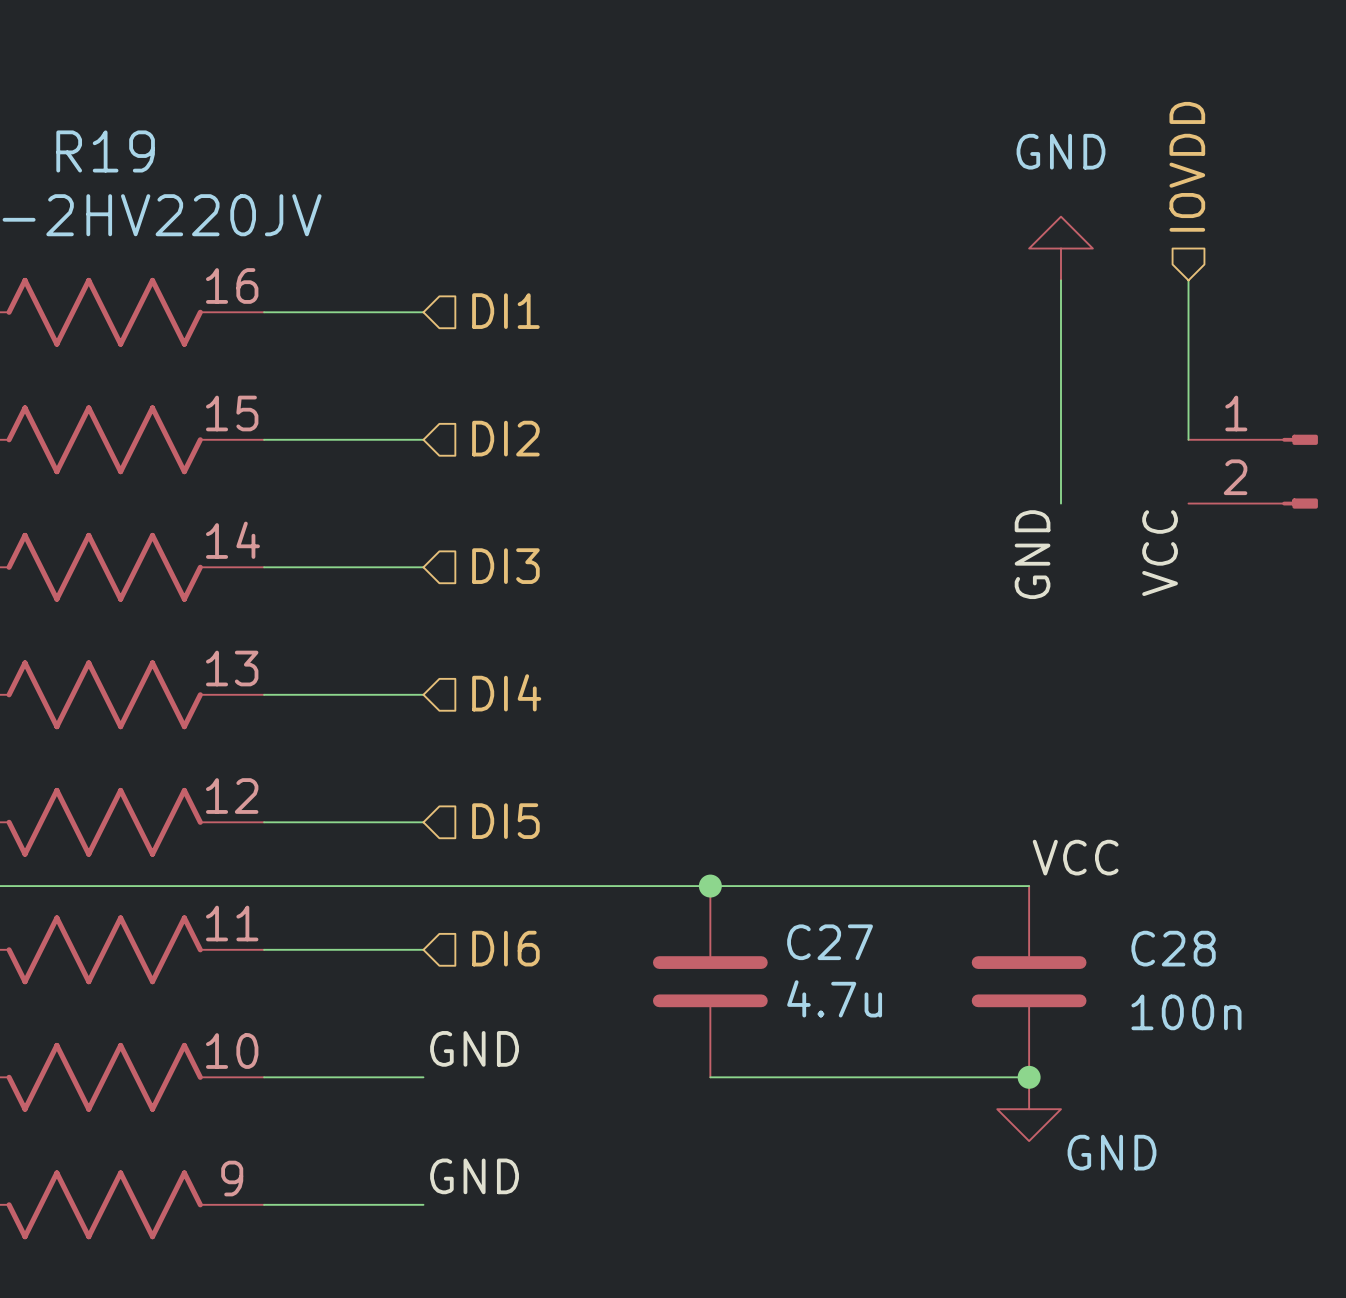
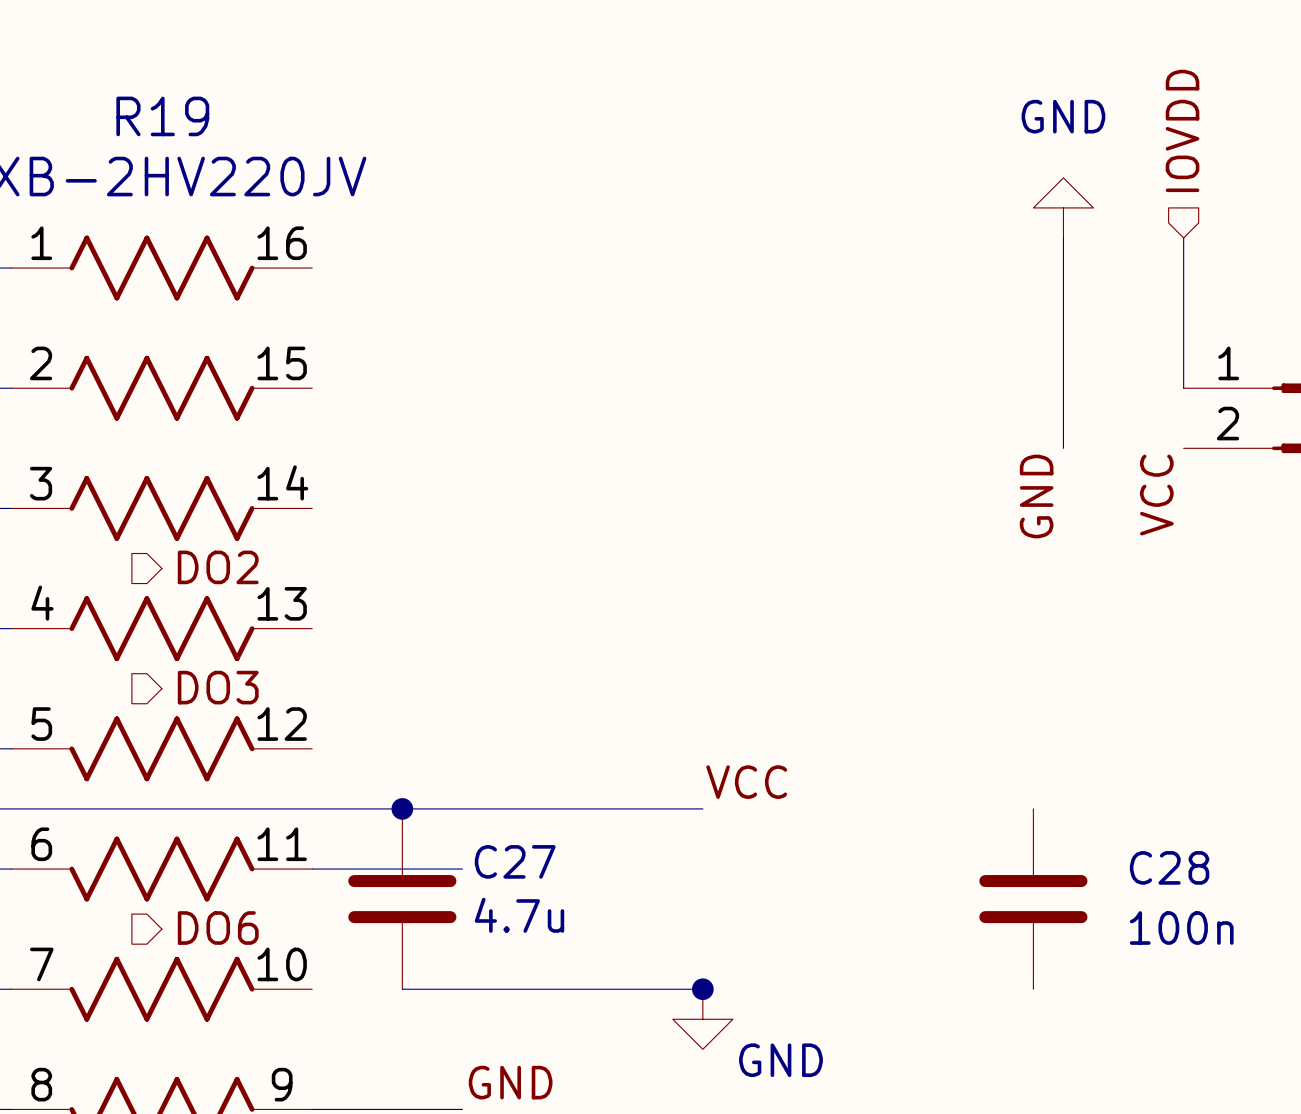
hierarchical label: DI1 (505, 311) -> none
wire: (264, 312) (423, 312) -> none
hierarchical label: DI2 (505, 438) -> none
wire: (264, 439) (423, 439) -> none
hierarchical label: DI3 (505, 566) -> none
wire: (264, 567) (423, 567) -> none
hierarchical label: none -> DO2 (218, 567)
hierarchical label: DI4 (506, 692) -> none
wire: (264, 694) (423, 694) -> none
hierarchical label: none -> DO3 (218, 687)
hierarchical label: DI5 (505, 821) -> none
wire: (264, 822) (423, 822) -> none
label position: VCC (1075, 857) -> VCC (746, 782)
junction: none -> (402, 808)
wire: (678, 886) (1029, 886) -> none
junction: (710, 886) -> none
hierarchical label: DI6 (505, 948) -> none
C27 position: (710, 981) -> (402, 899)
hierarchical label: none -> DO6 (218, 928)
label: GND (474, 1048) -> none
wire: (264, 1077) (359, 1077) -> none
wire: none -> (462, 989) (702, 989)
junction: none -> (702, 989)
wire: (710, 1077) (1029, 1077) -> none
junction: (1029, 1077) -> none
power symbol position: GND (1029, 1109) -> GND (702, 1019)

